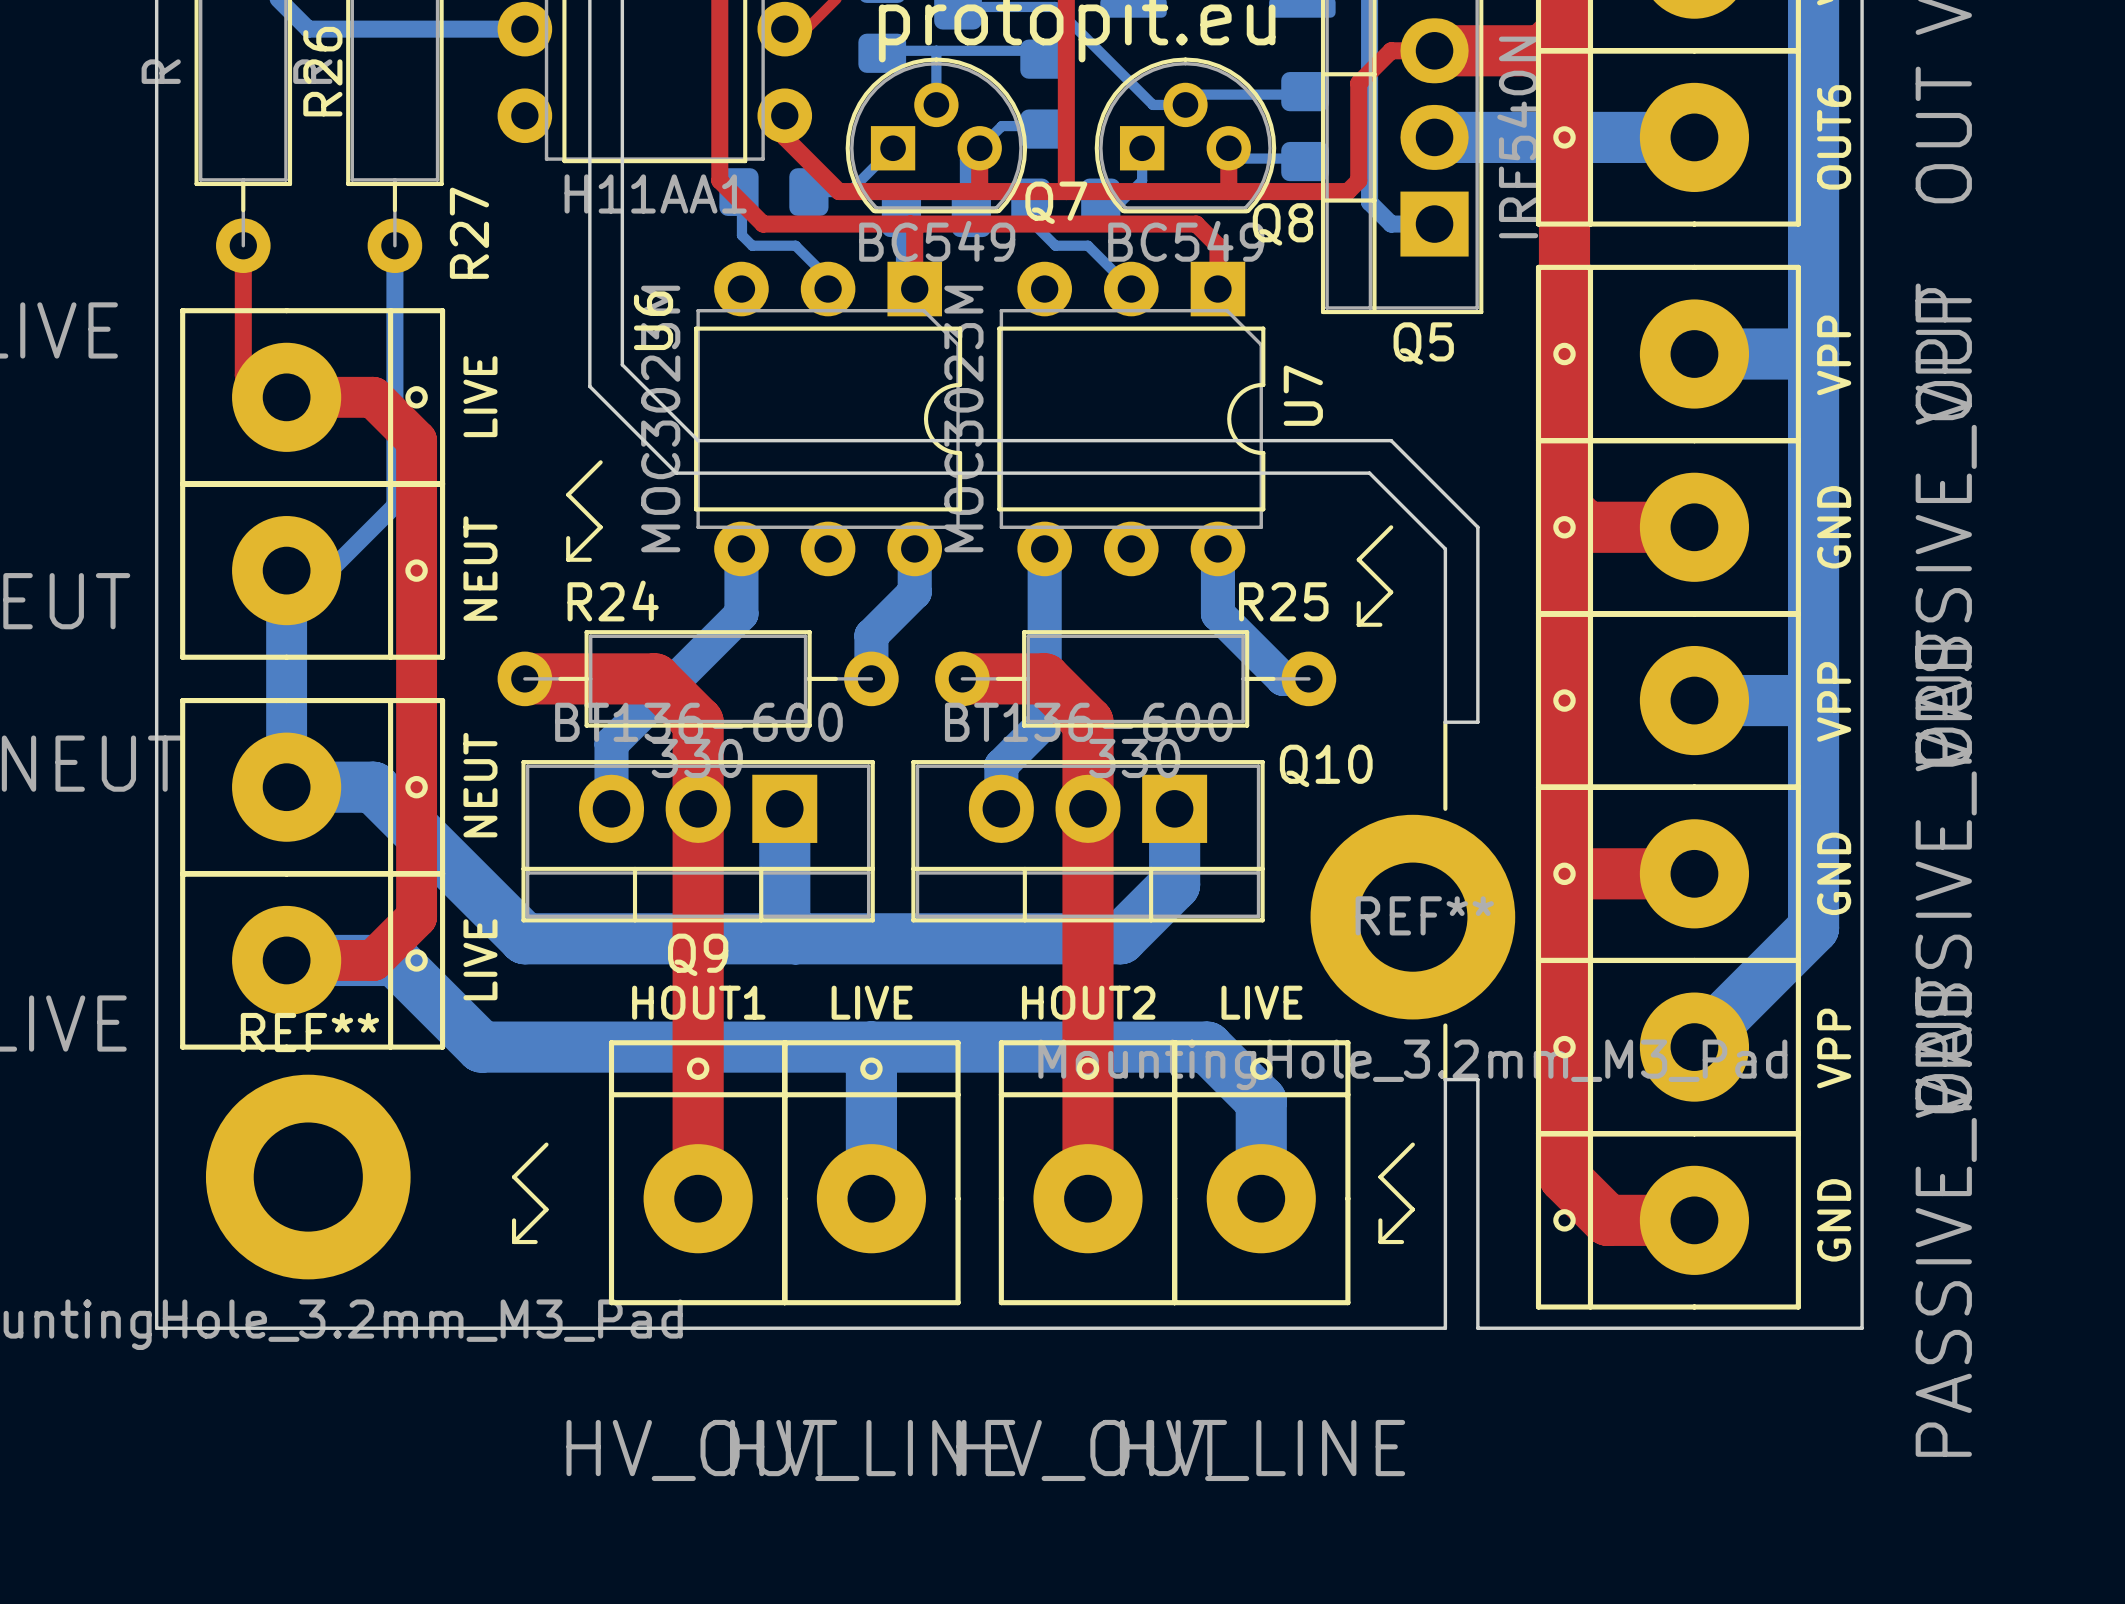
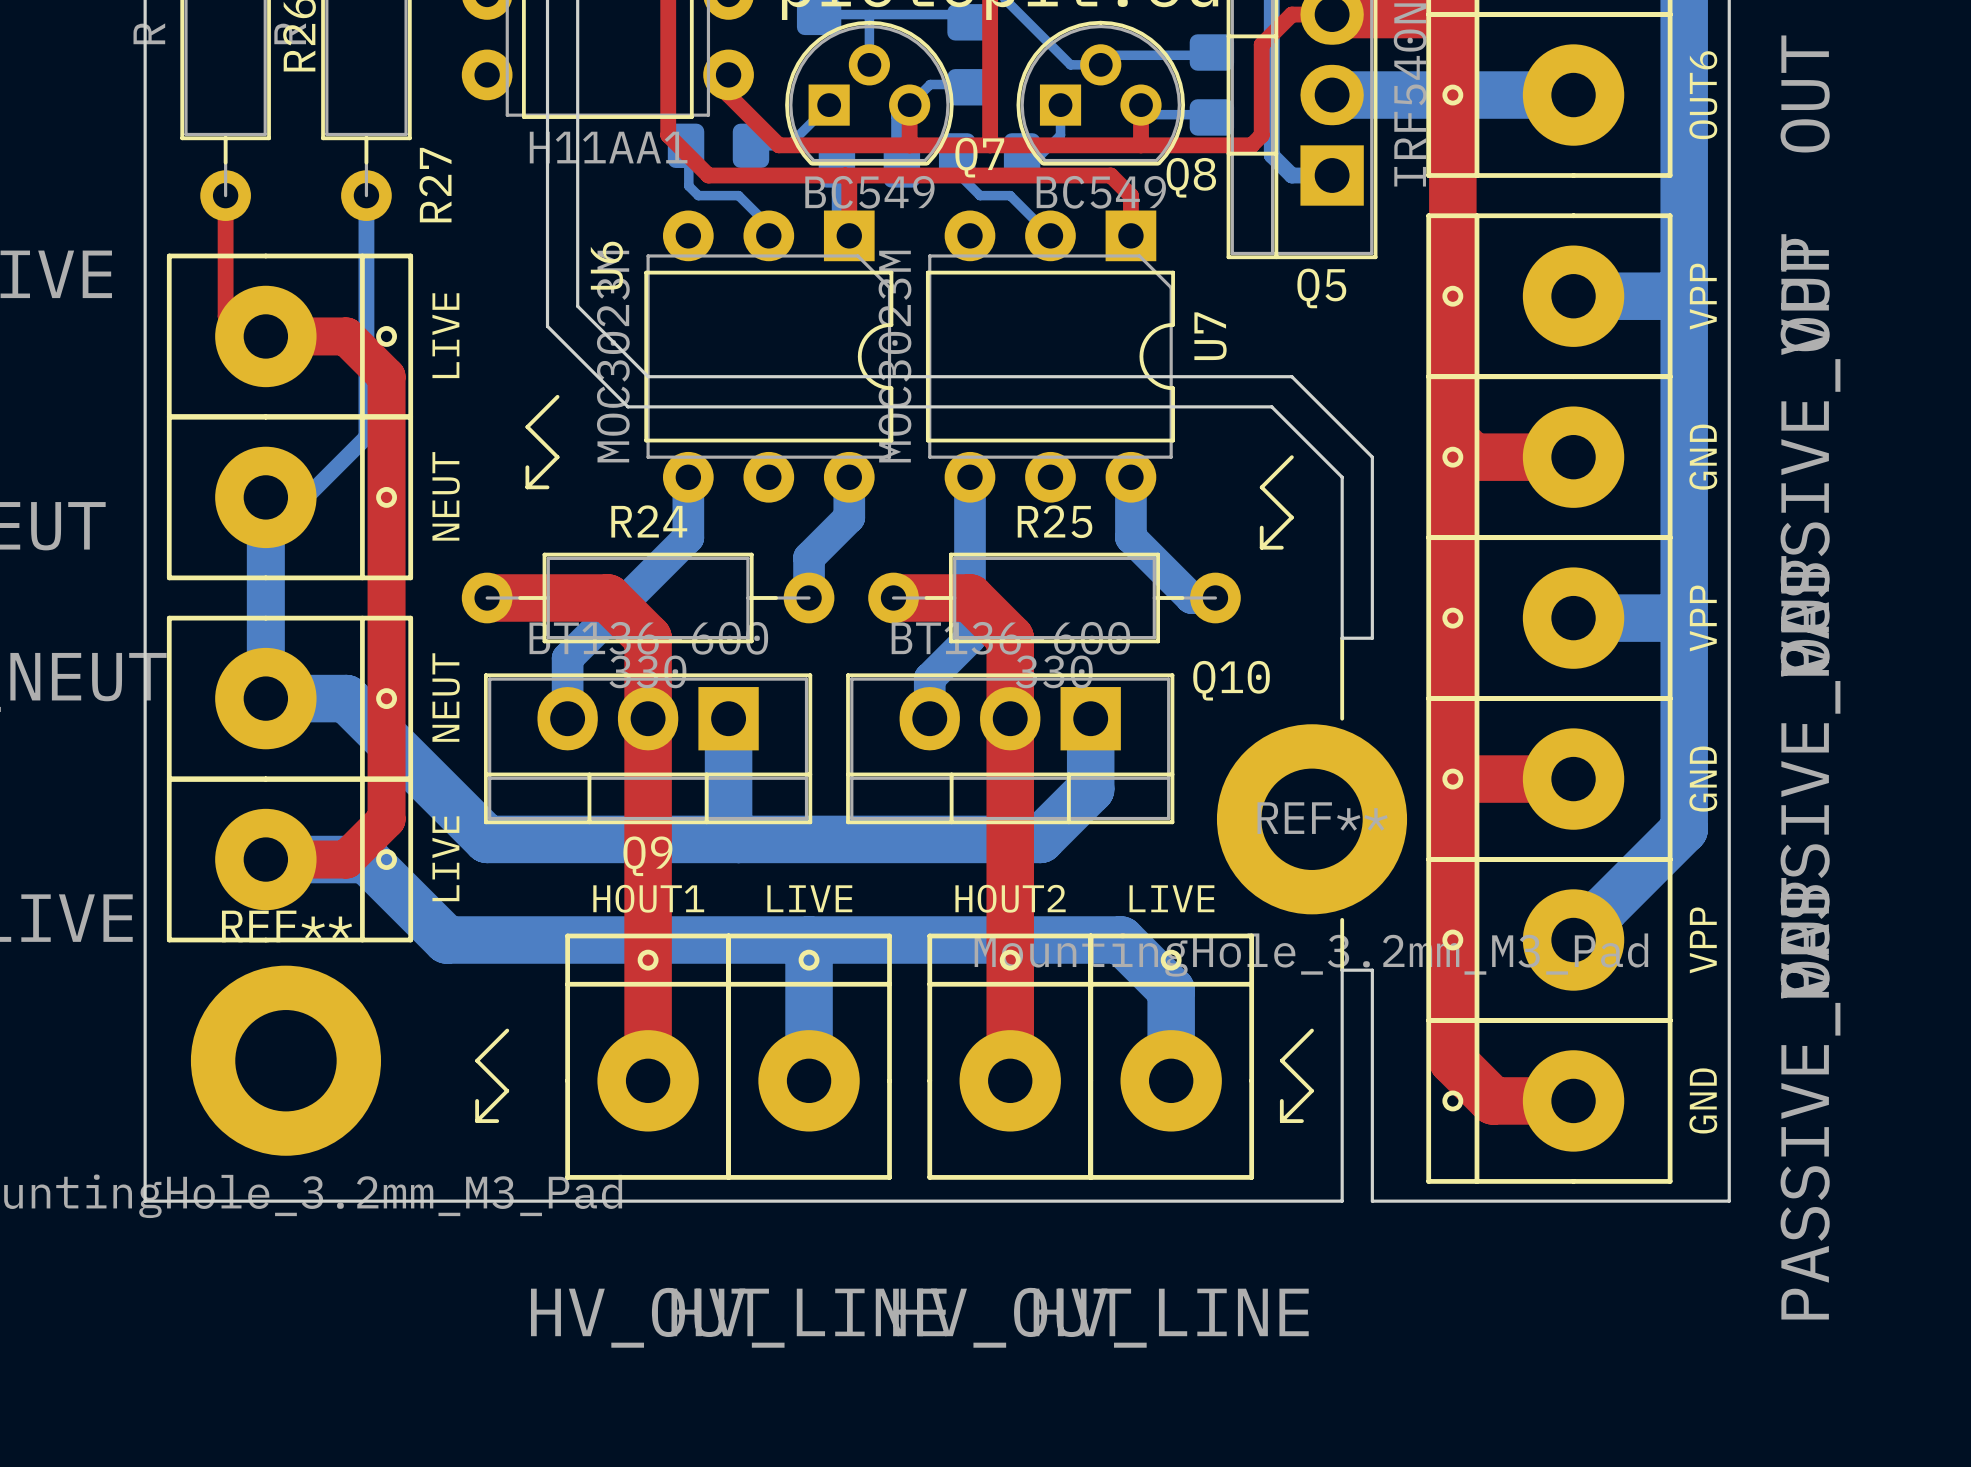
R24 name position: R24 (613, 601) -> R24 (649, 521)
R25 name position: R25 (1283, 601) -> R25 (1055, 521)

